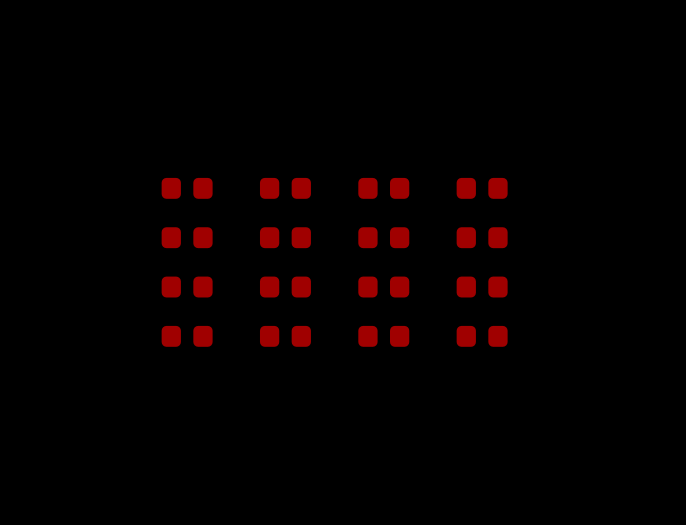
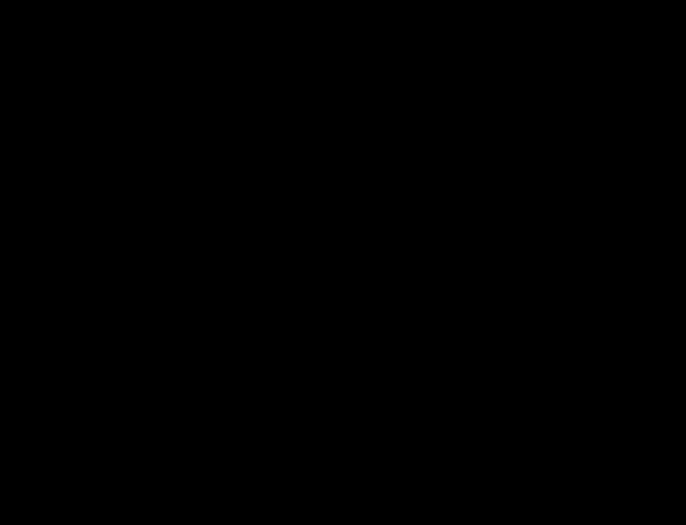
part: (187, 188) -> none
part: (285, 188) -> none
part: (383, 188) -> none
part: (482, 188) -> none
part: (187, 237) -> none
part: (285, 237) -> none
part: (383, 237) -> none
part: (482, 237) -> none
part: (187, 287) -> none
part: (285, 287) -> none
part: (383, 287) -> none
part: (482, 287) -> none
part: (187, 336) -> none
part: (285, 336) -> none
part: (383, 336) -> none
part: (482, 336) -> none

